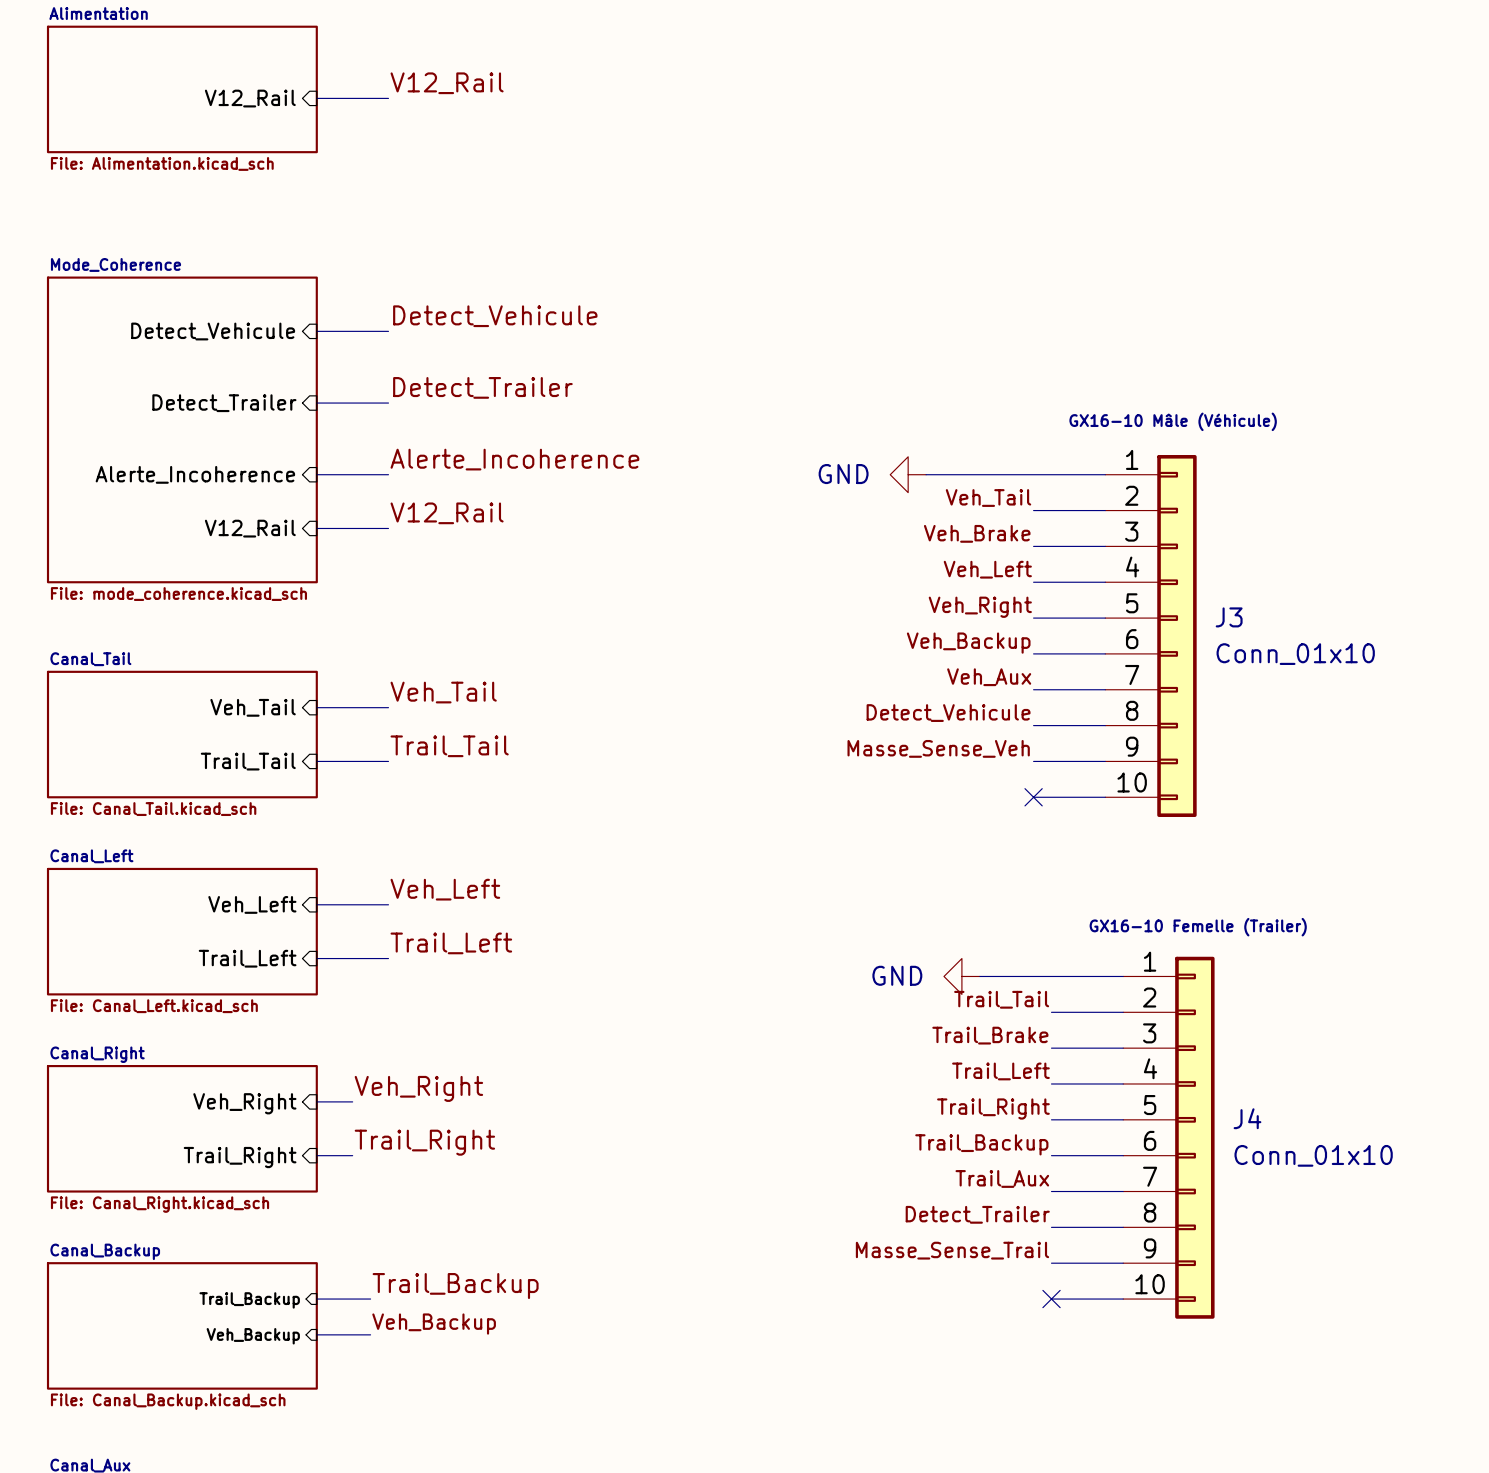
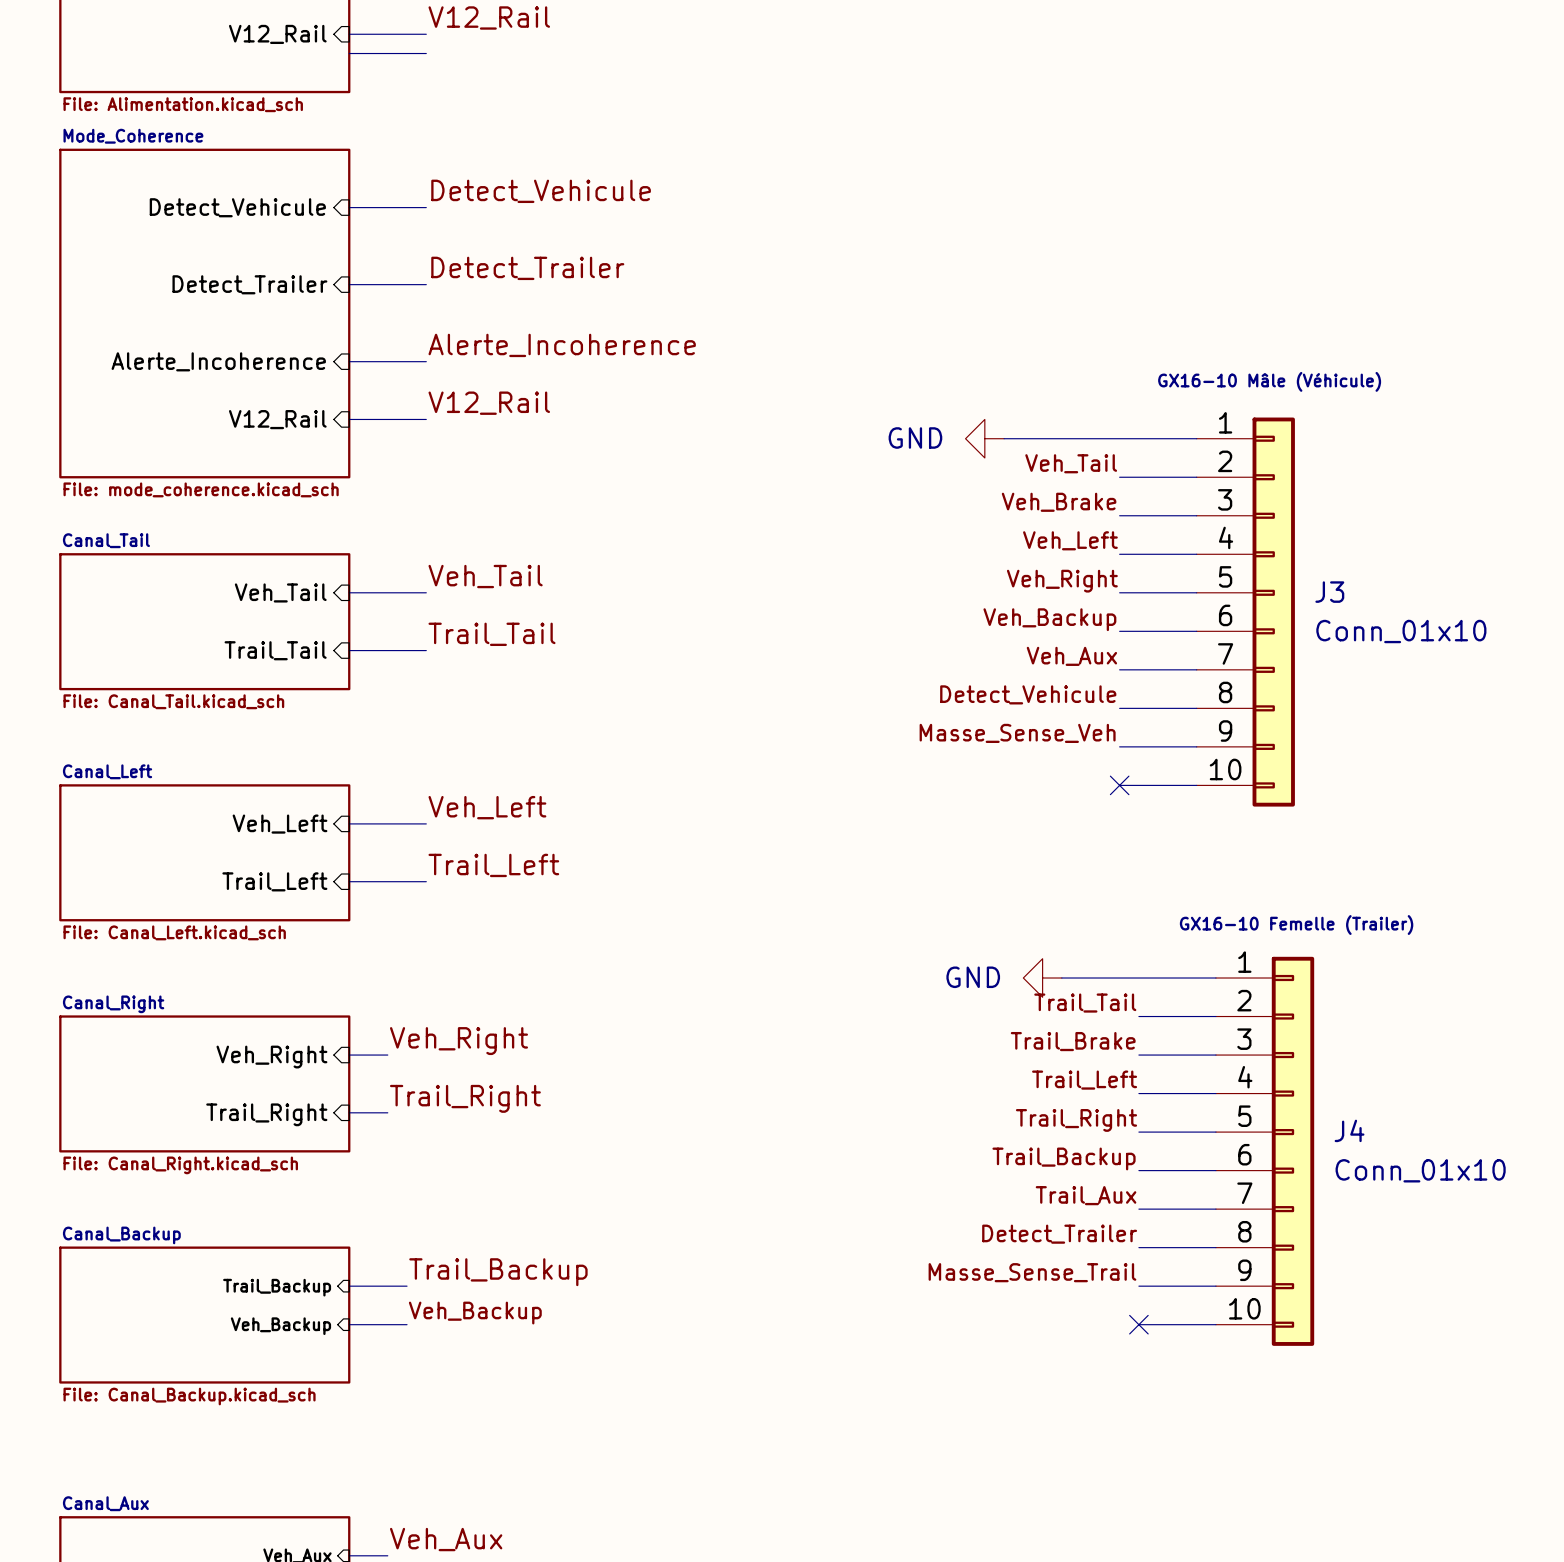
wire: none -> (349, 53) (426, 53)
label: none -> Detect_Vehicule (541, 191)
sheet pin: none -> Detect_Vehicule (237, 207)
label: Detect_Vehicule (495, 316) -> Detect_Trailer (527, 268)
sheet pin: Detect_Vehicule (213, 331) -> Detect_Trailer (249, 284)
label: Detect_Trailer (482, 387) -> Alerte_Incoherence (562, 345)
sheet pin: Detect_Trailer (224, 403) -> Alerte_Incoherence (218, 361)
sheet Mode_Coherence position: (182, 429) -> (204, 313)
label: Alerte_Incoherence (514, 459) -> none
sheet pin: Alerte_Incoherence (195, 474) -> none
wire: (316, 474) (388, 474) -> (349, 207) (426, 207)
label position: V12_Rail (447, 513) -> V12_Rail (489, 403)
sheet pin position: V12_Rail (250, 528) -> V12_Rail (277, 419)
wire: (316, 528) (388, 528) -> (349, 419) (426, 419)
label position: Veh_Tail (443, 692) -> Veh_Tail (485, 576)
sheet pin position: Veh_Tail (253, 707) -> Veh_Tail (280, 592)
wire: (316, 707) (388, 707) -> (349, 592) (426, 592)
sheet Canal_Tail position: (182, 734) -> (204, 621)
label position: Trail_Tail (449, 746) -> Trail_Tail (492, 634)
sheet pin position: Trail_Tail (248, 761) -> Trail_Tail (275, 650)
wire: (316, 761) (388, 761) -> (349, 650) (426, 650)
label position: Veh_Left (445, 889) -> Veh_Left (487, 807)
sheet pin position: Veh_Left (252, 904) -> Veh_Left (280, 824)
wire: (316, 904) (388, 904) -> (349, 823) (426, 823)
sheet Canal_Left position: (182, 931) -> (204, 852)
label position: Trail_Left (451, 943) -> Trail_Left (493, 865)
sheet pin position: Trail_Left (247, 958) -> Trail_Left (274, 881)
wire: (316, 958) (388, 958) -> (349, 881) (426, 881)
label: none -> Veh_Right (458, 1041)
sheet pin: none -> Veh_Right (271, 1057)
label: Veh_Right (418, 1088) -> Trail_Right (465, 1098)
sheet pin: Veh_Right (244, 1103) -> Trail_Right (266, 1114)
sheet Canal_Right position: (182, 1128) -> (204, 1083)
label: Trail_Right (424, 1142) -> none
wire: (316, 1155) (352, 1155) -> (349, 1055) (387, 1055)
sheet pin: Trail_Right (240, 1157) -> none
label: none -> Trail_Backup (498, 1272)
sheet pin: none -> Trail_Backup (277, 1287)
label: Trail_Backup (455, 1286) -> Veh_Backup (475, 1313)
sheet pin: Trail_Backup (249, 1300) -> Veh_Backup (280, 1326)
label: Veh_Backup (434, 1324) -> none
sheet Canal_Backup position: (182, 1325) -> (204, 1315)
wire: (316, 1334) (370, 1334) -> (349, 1286) (407, 1286)
sheet pin: Veh_Backup (253, 1336) -> none

